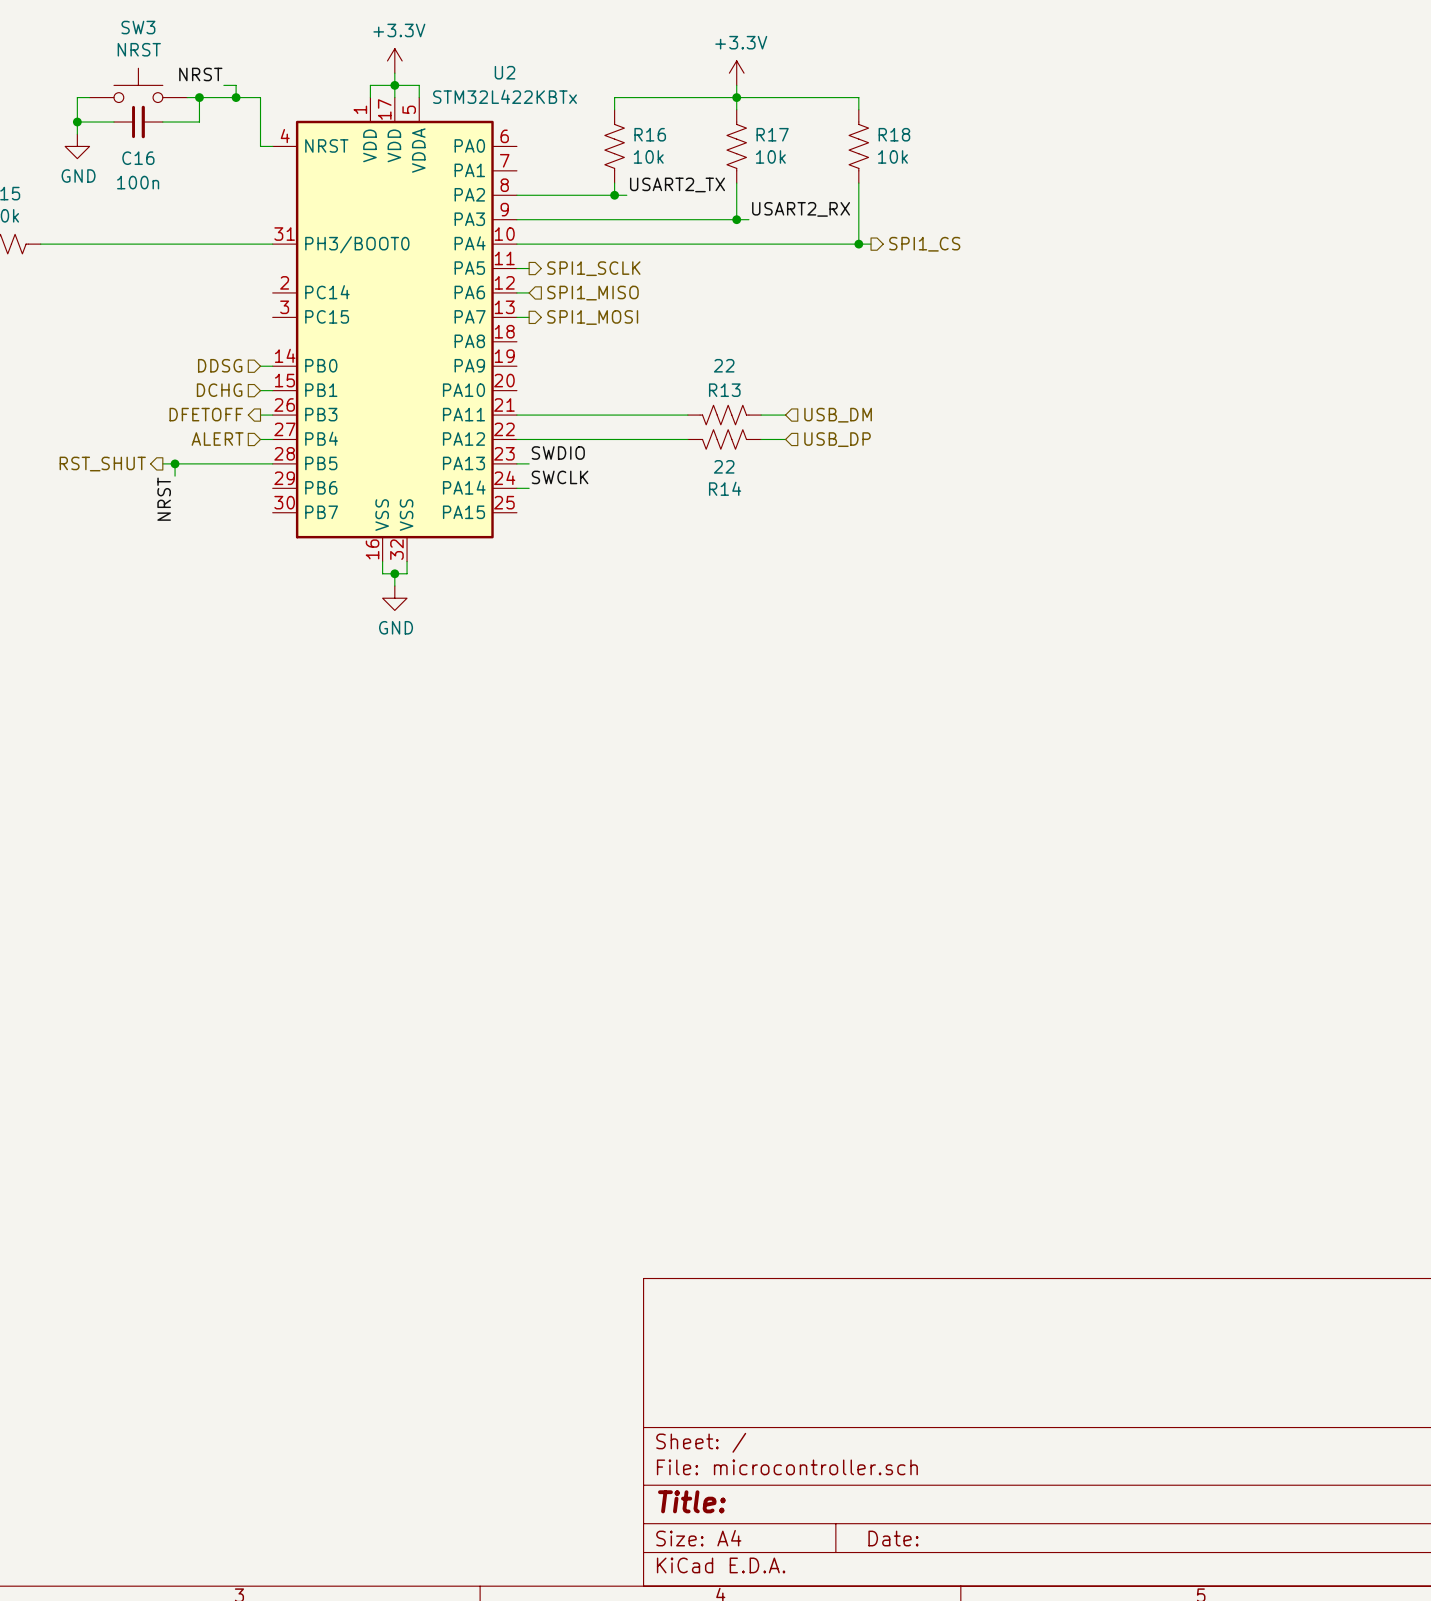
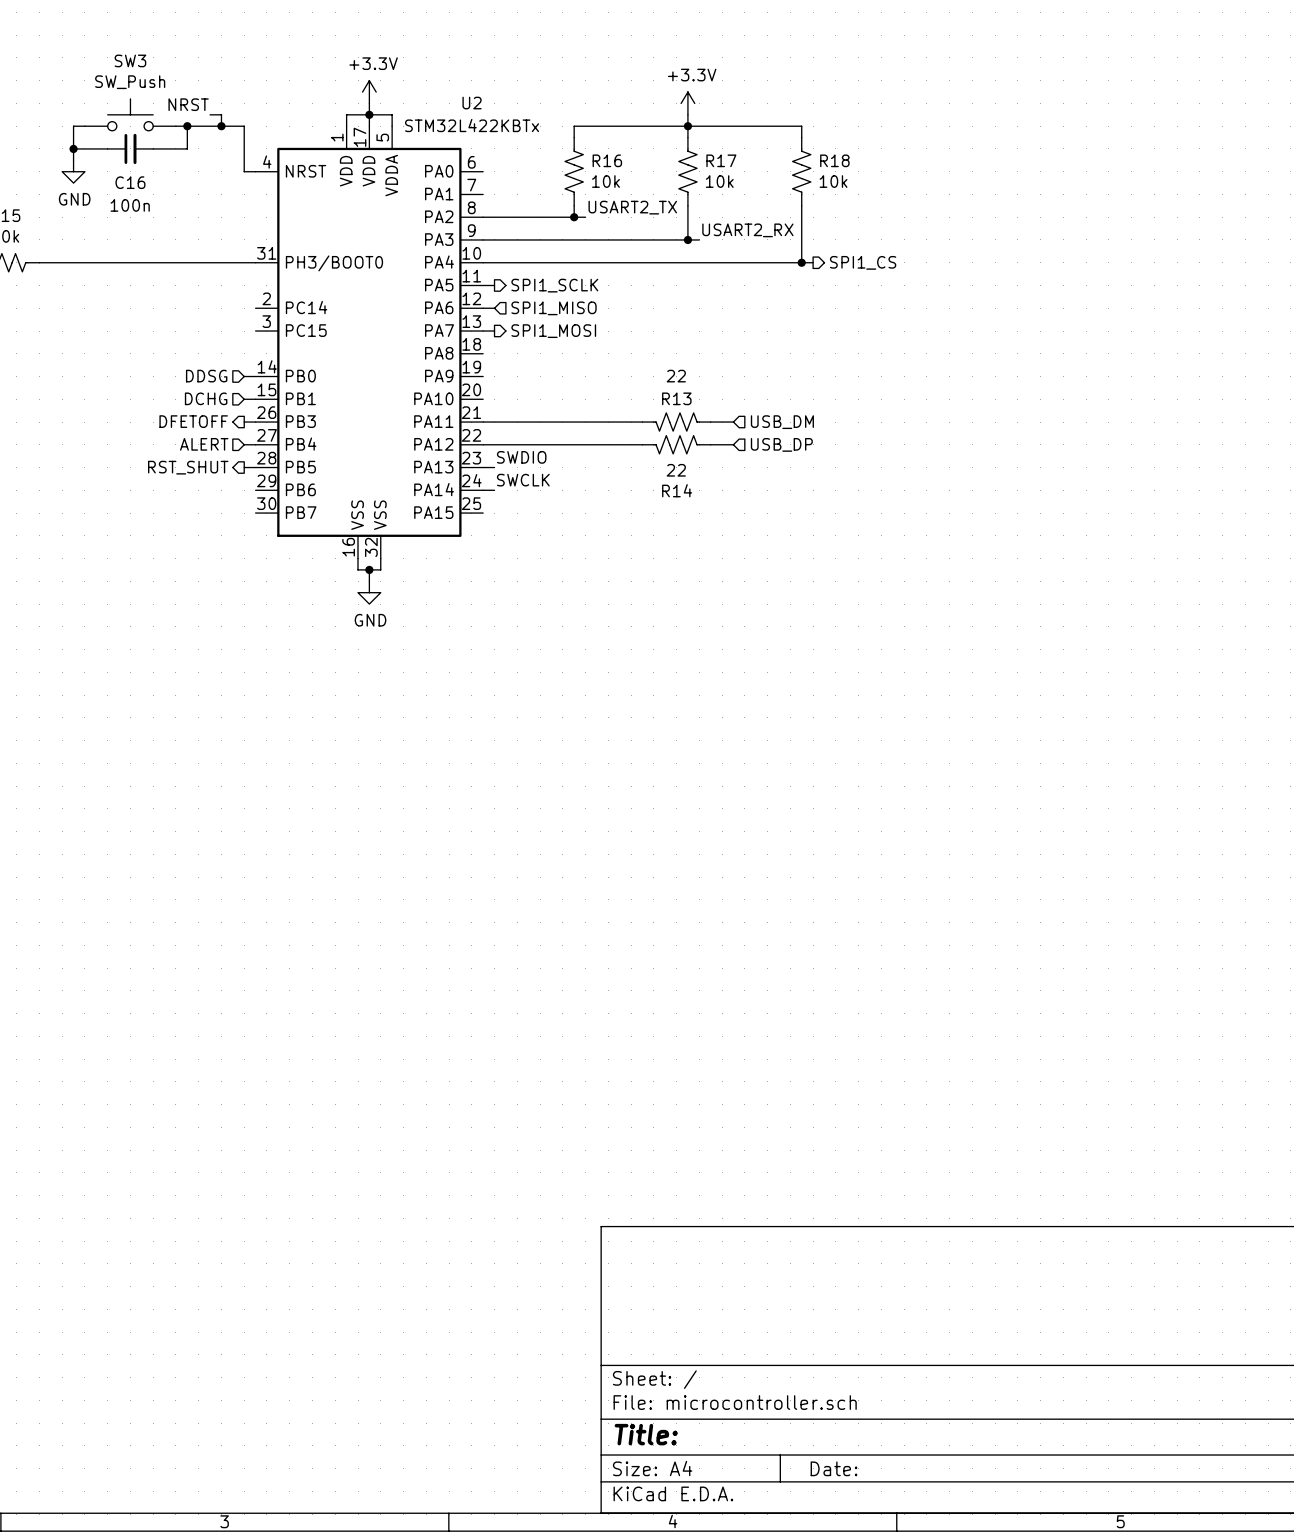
SW3 value: NRST (139, 49) -> SW_Push (130, 82)
wire: (162, 463) (260, 463) -> none
wire: (175, 463) (175, 476) -> none
junction: (175, 463) -> none
hierarchical label position: RST_SHUT (102, 464) -> RST_SHUT (188, 467)
label: NRST (164, 499) -> none

